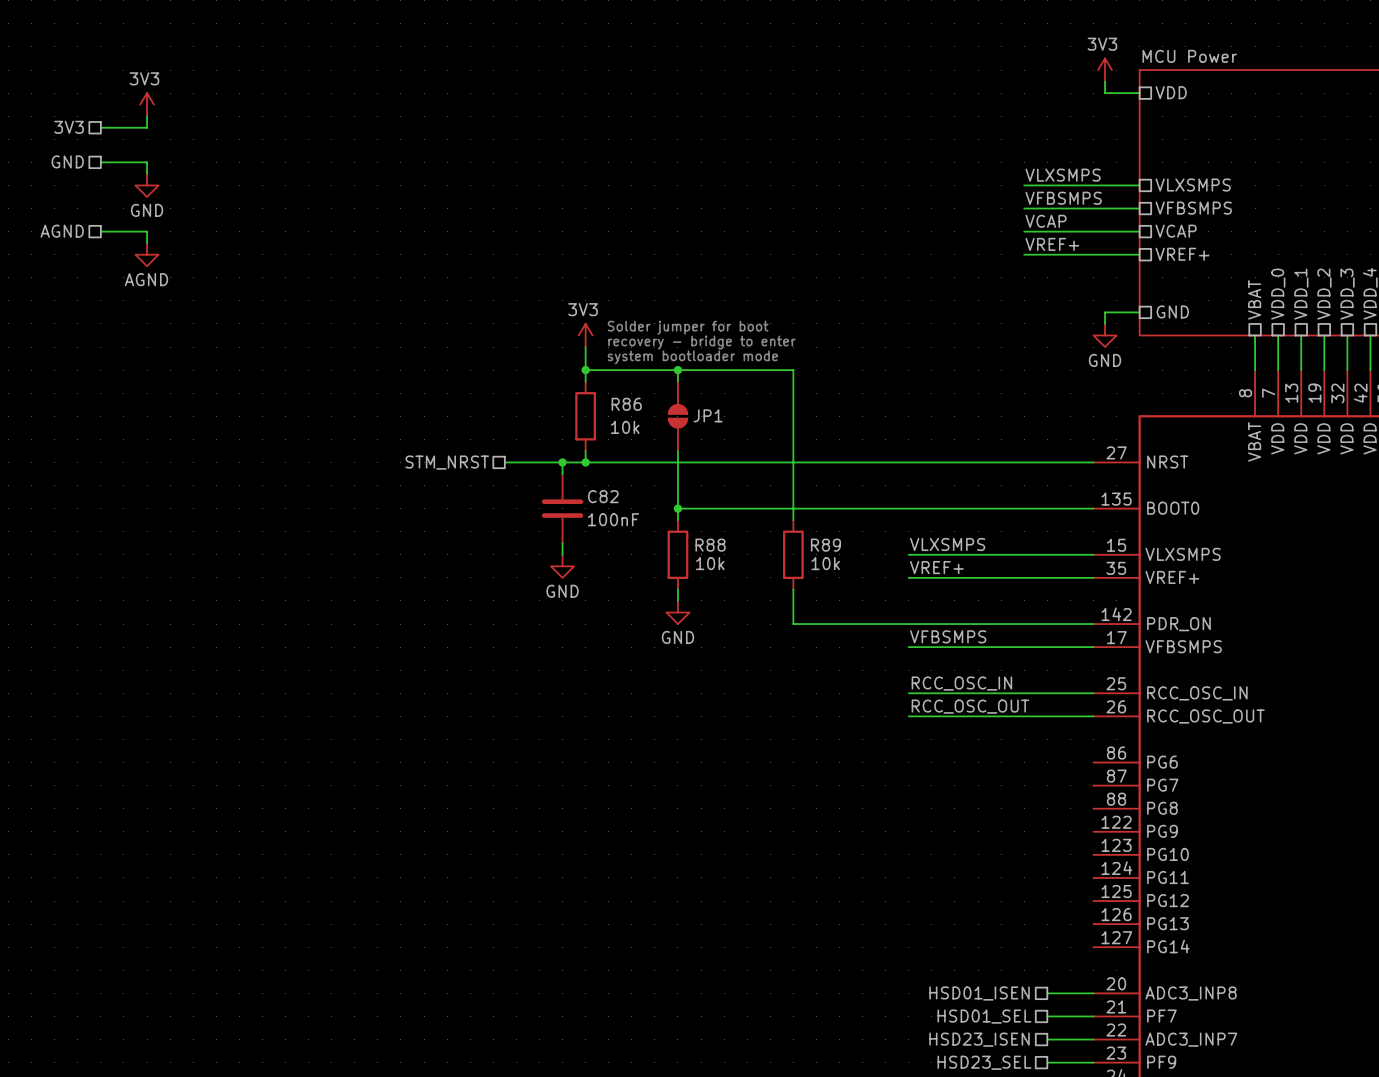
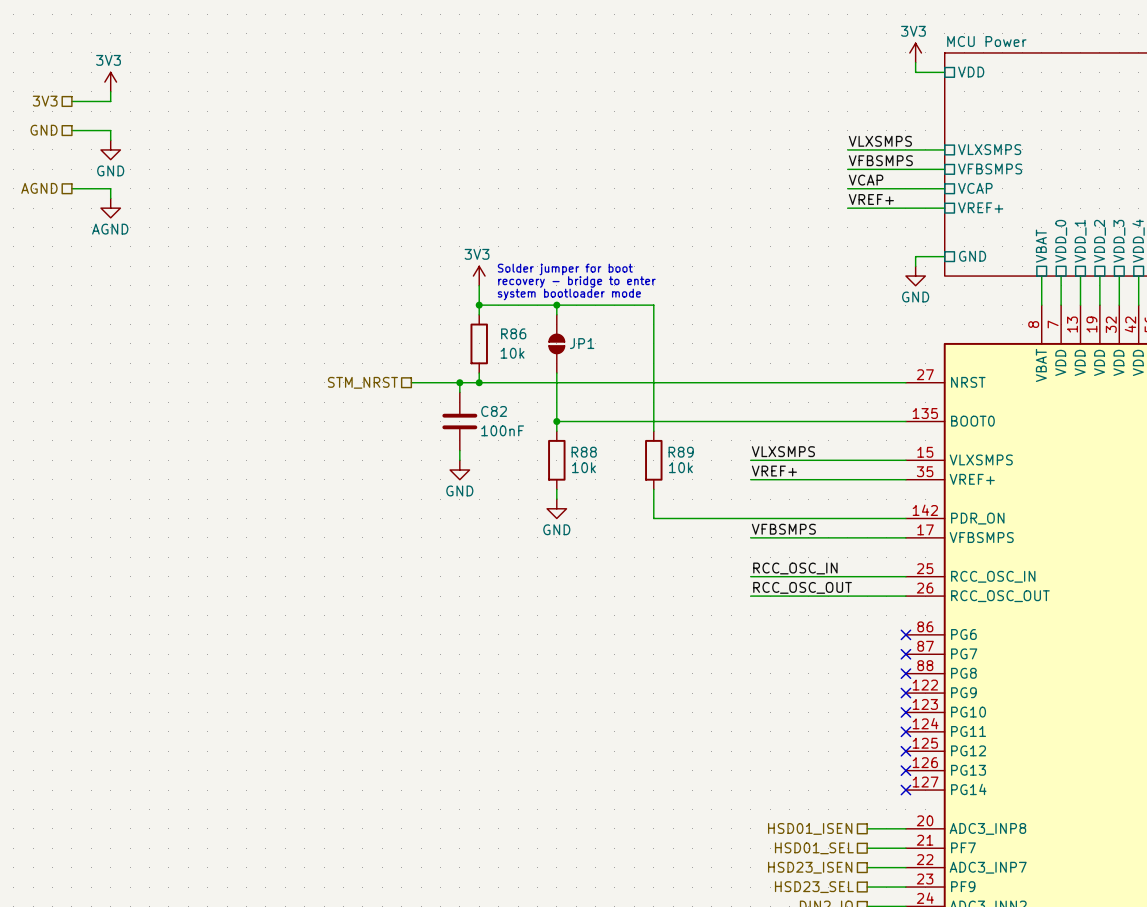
no-connect mark: none -> (905, 634)
no-connect mark: none -> (905, 654)
no-connect mark: none -> (905, 673)
no-connect mark: none -> (905, 693)
no-connect mark: none -> (905, 712)
no-connect mark: none -> (905, 731)
no-connect mark: none -> (905, 751)
no-connect mark: none -> (905, 770)
no-connect mark: none -> (905, 790)

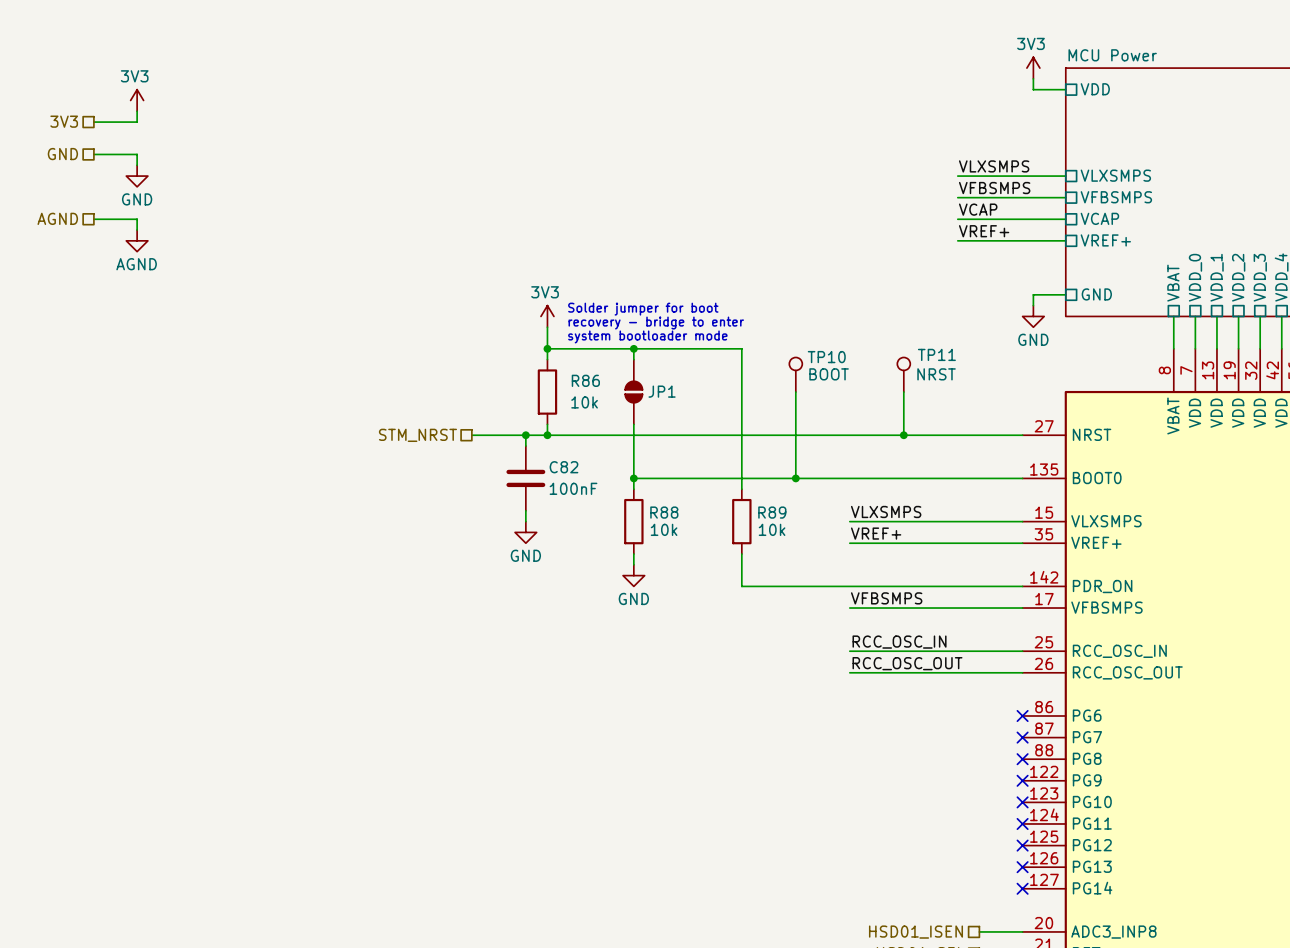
TP10: none -> BOOT (795, 374)
TP11: none -> NRST (903, 374)
wire: none -> (795, 392) (795, 478)
wire: none -> (903, 392) (903, 435)
junction: none -> (903, 435)
junction: none -> (795, 478)

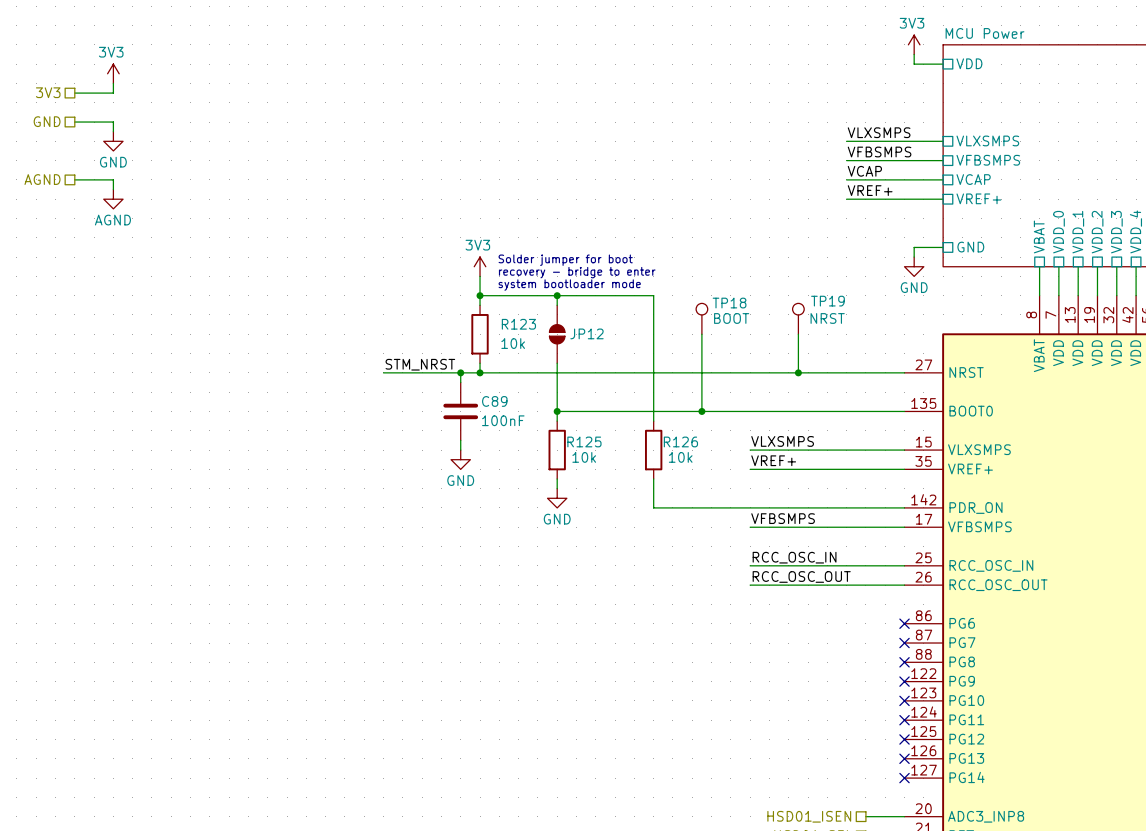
TP11 name: TP11 (936, 354) -> TP19 (827, 301)
TP10 name: TP10 (826, 357) -> TP18 (729, 303)
R86 name: R86 (585, 380) -> R123 (518, 324)
JP1 name: JP1 (662, 391) -> JP12 (586, 333)
label: none -> STM_NRST (420, 364)
hierarchical label: STM_NRST (417, 435) -> none
wire: none -> (383, 372) (412, 372)
C82 name: C82 (563, 467) -> C89 (494, 401)
R88 name: R88 (664, 512) -> R125 (584, 441)
R89 name: R89 (772, 512) -> R126 (680, 441)

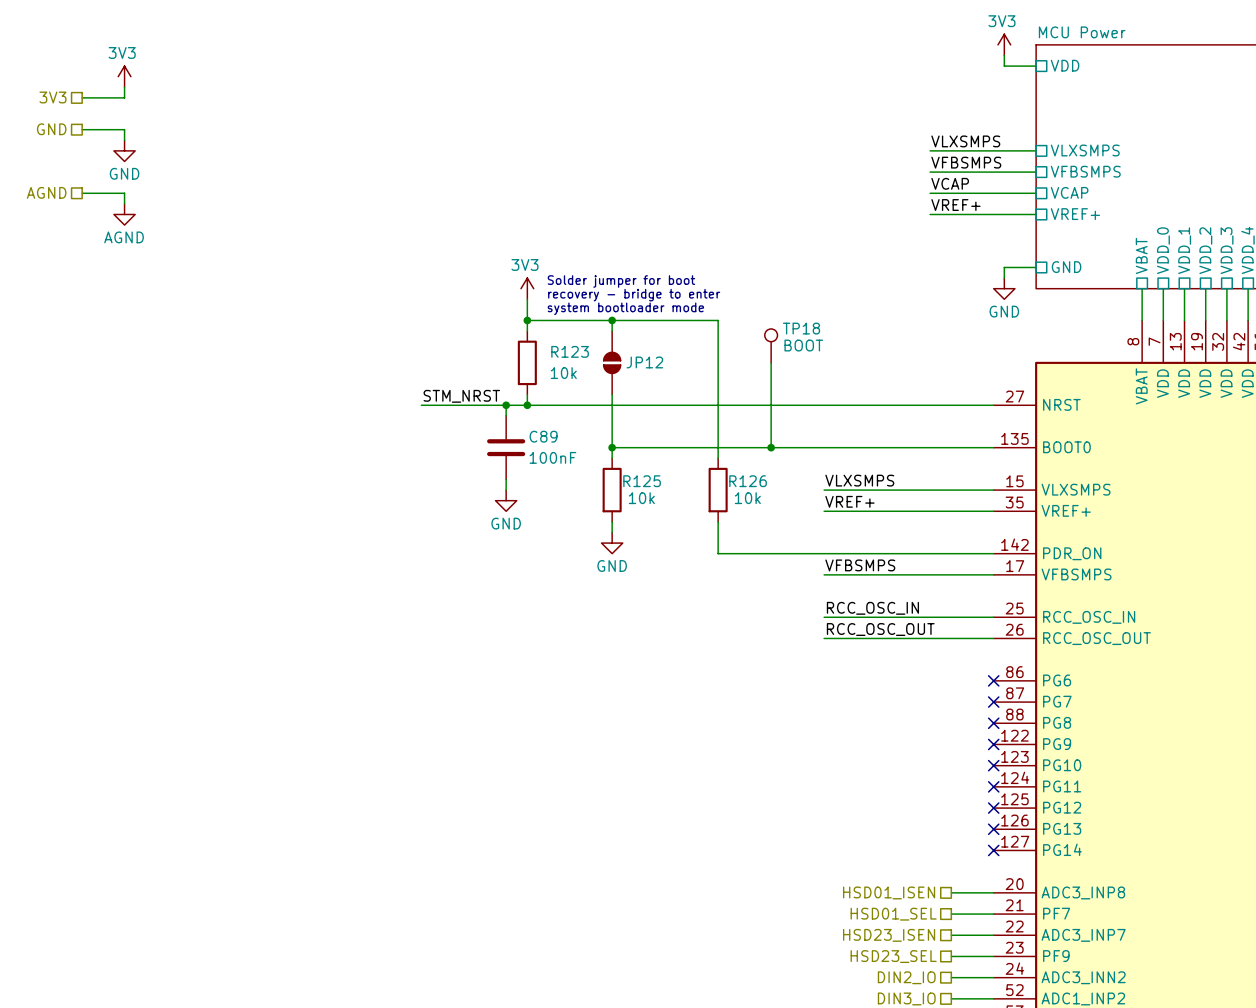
TP19: NRST (798, 318) -> none
wire: (798, 334) (798, 372) -> none
junction: (798, 372) -> none

